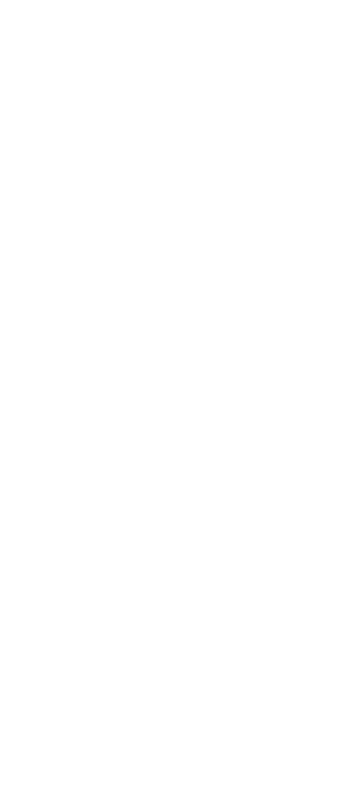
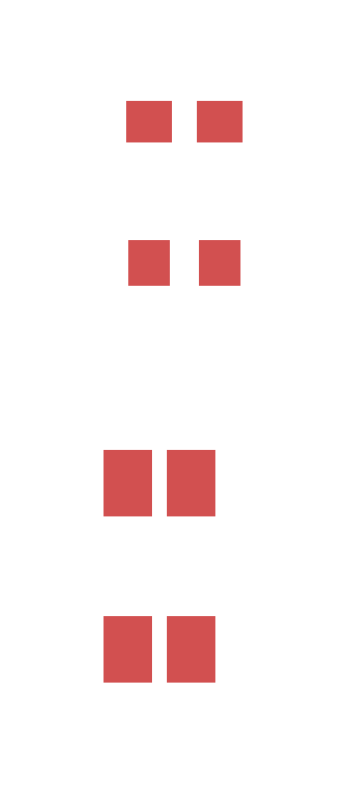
part: none -> (184, 121)
part: none -> (184, 262)
part: none -> (159, 483)
part: none -> (159, 649)

